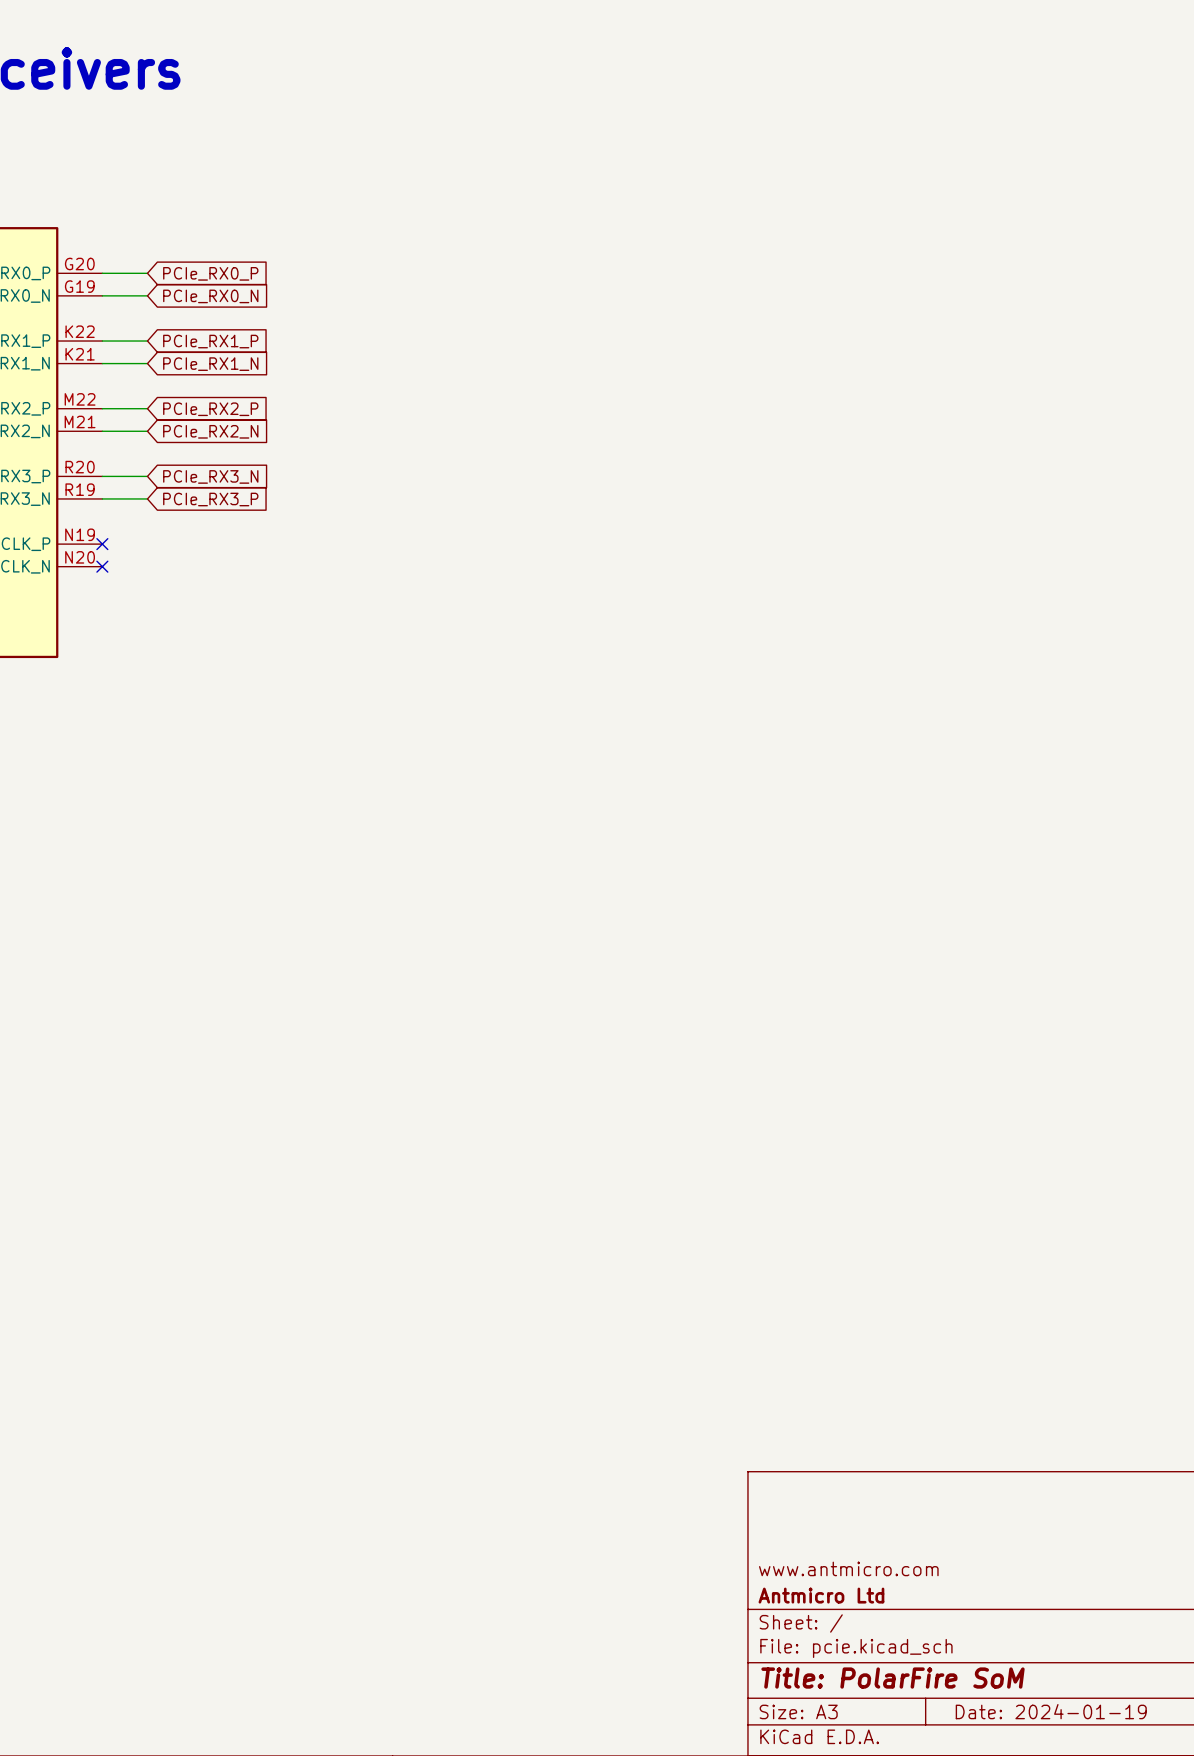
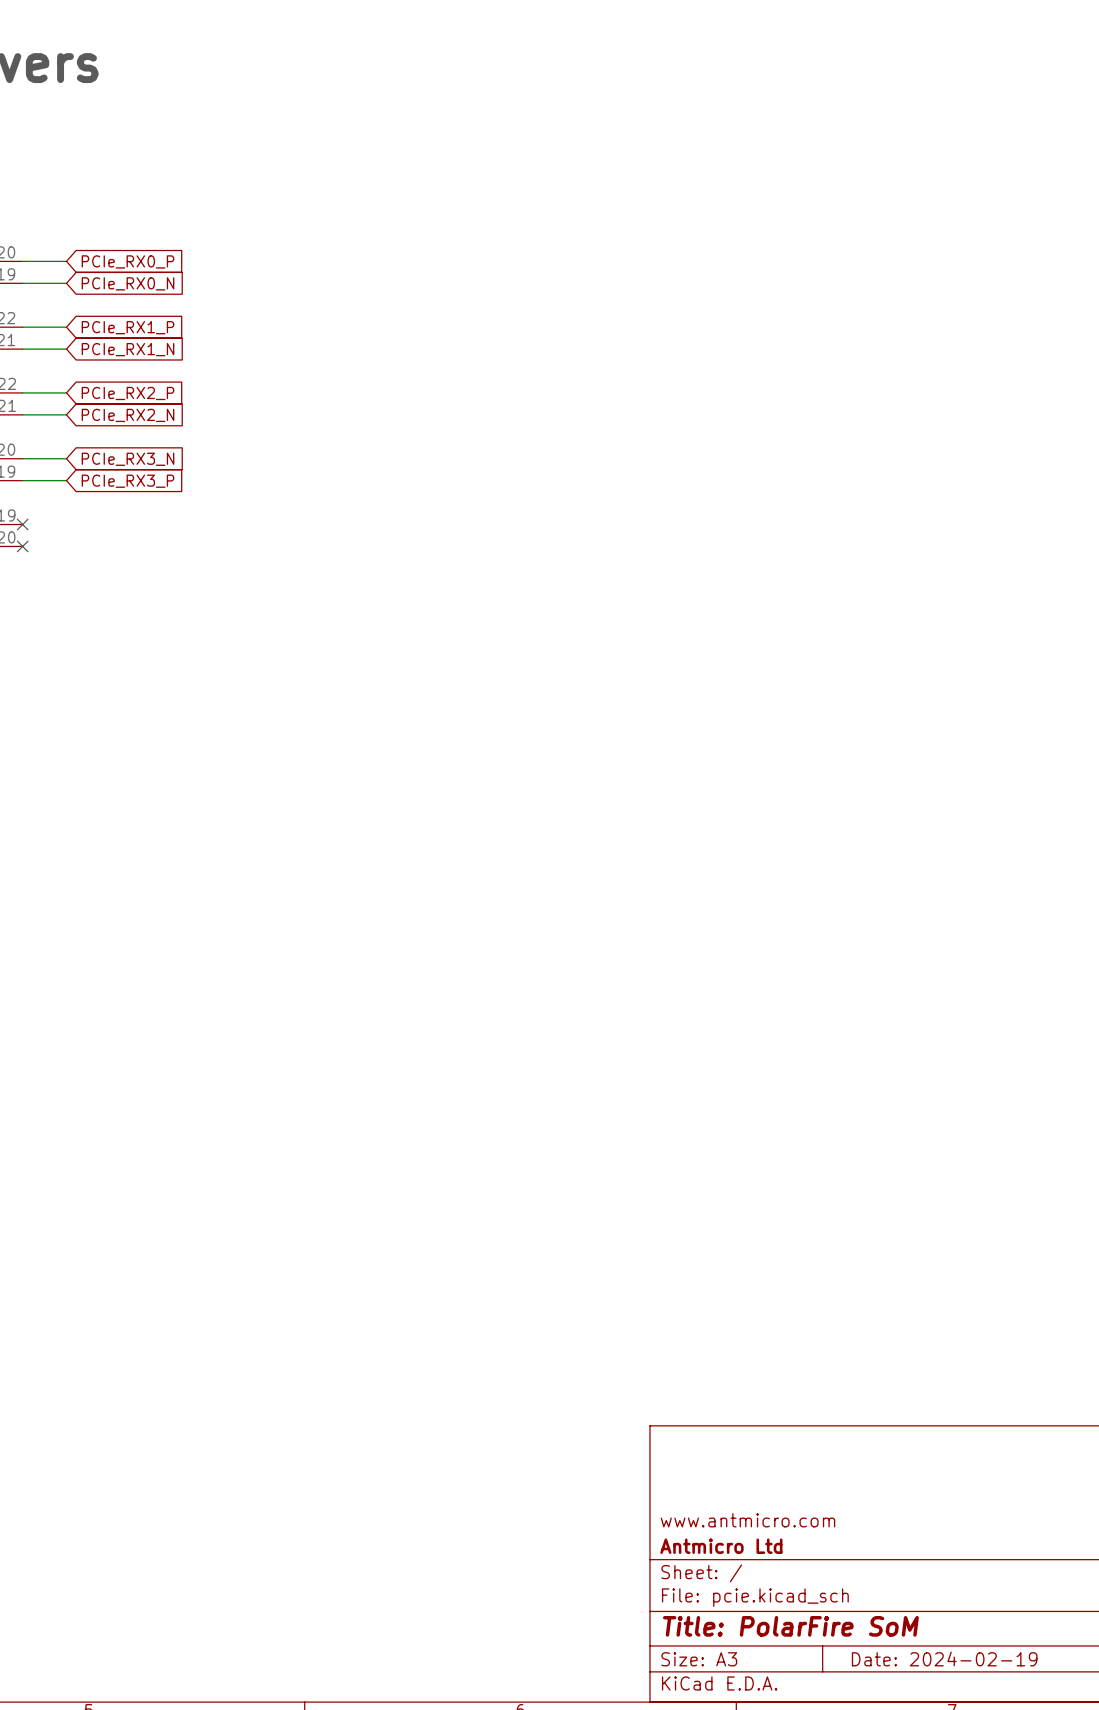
title block: Date: 2024-01-19 (1051, 1711) -> Date: 2024-02-19 (944, 1659)

